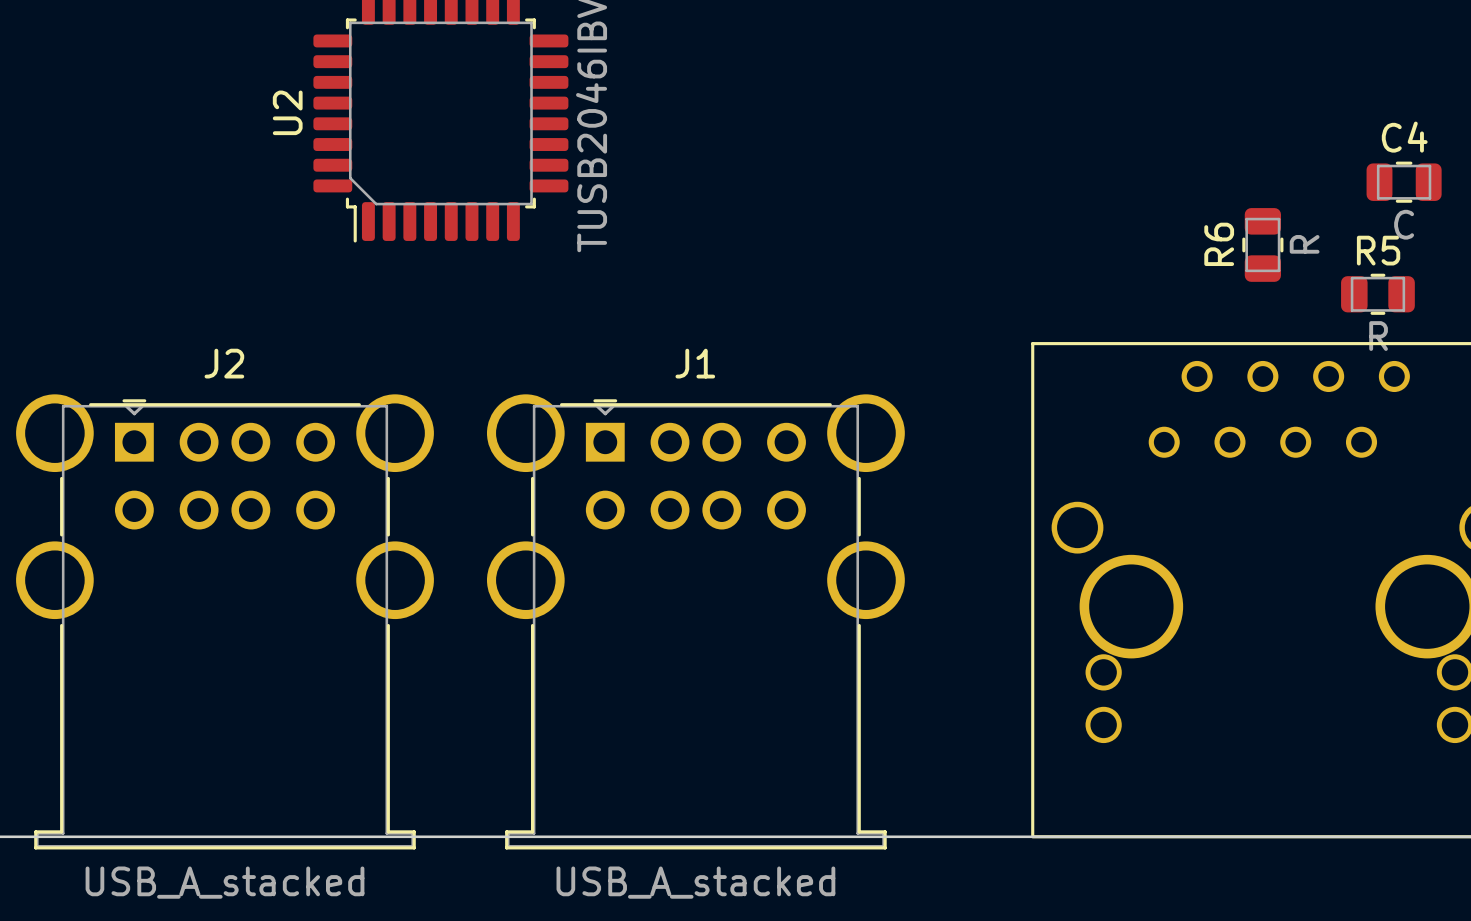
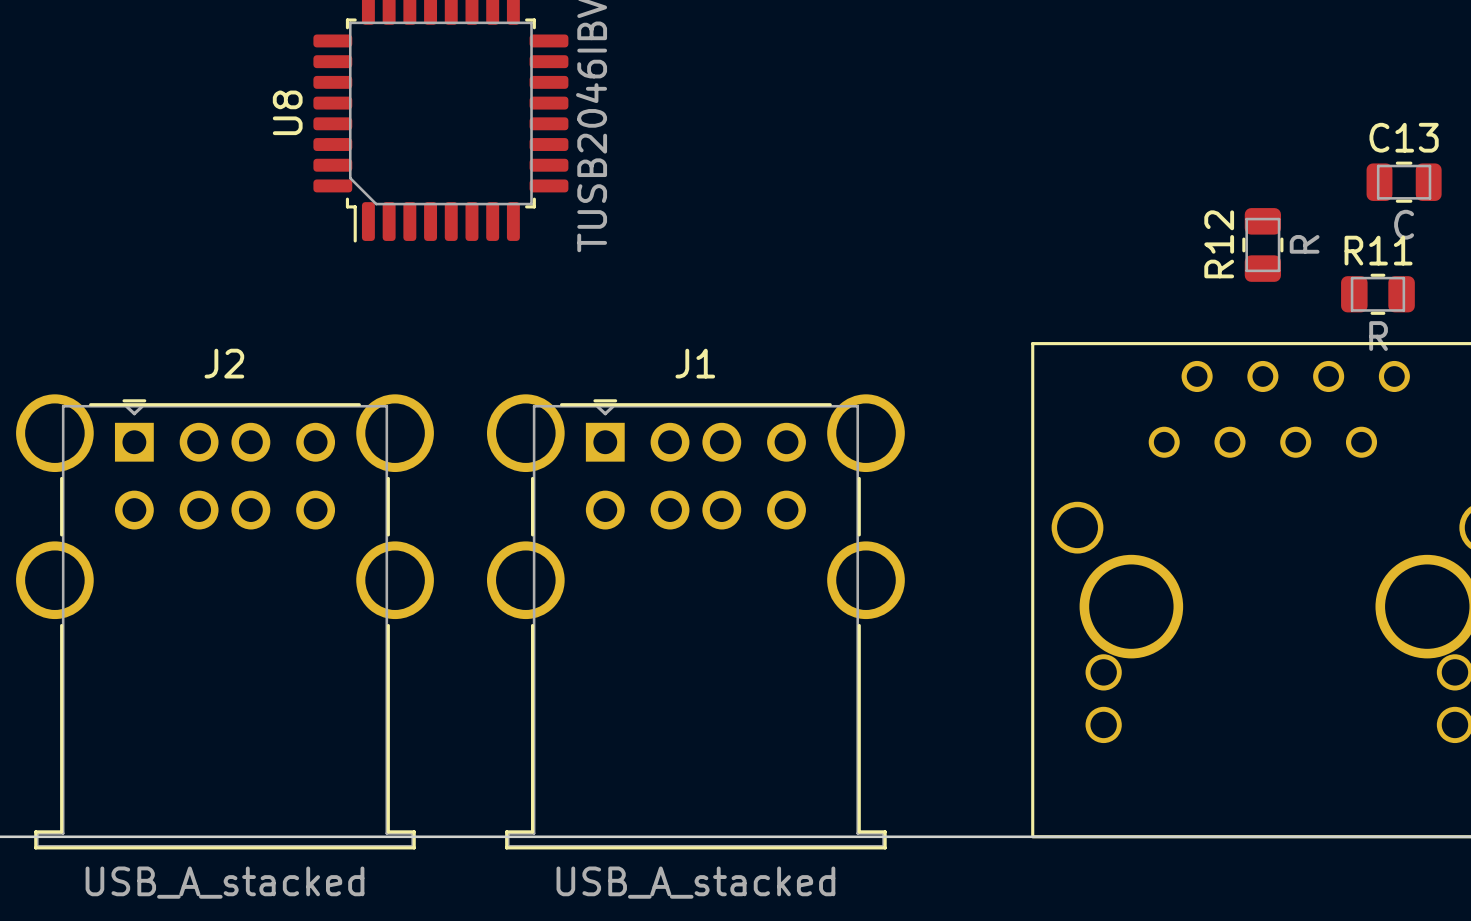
U2 name: U2 (287, 112) -> U8 (287, 112)
C4 name: C4 (1404, 137) -> C13 (1404, 137)
R6 name: R6 (1219, 244) -> R12 (1219, 244)
R5 name: R5 (1378, 250) -> R11 (1378, 250)

